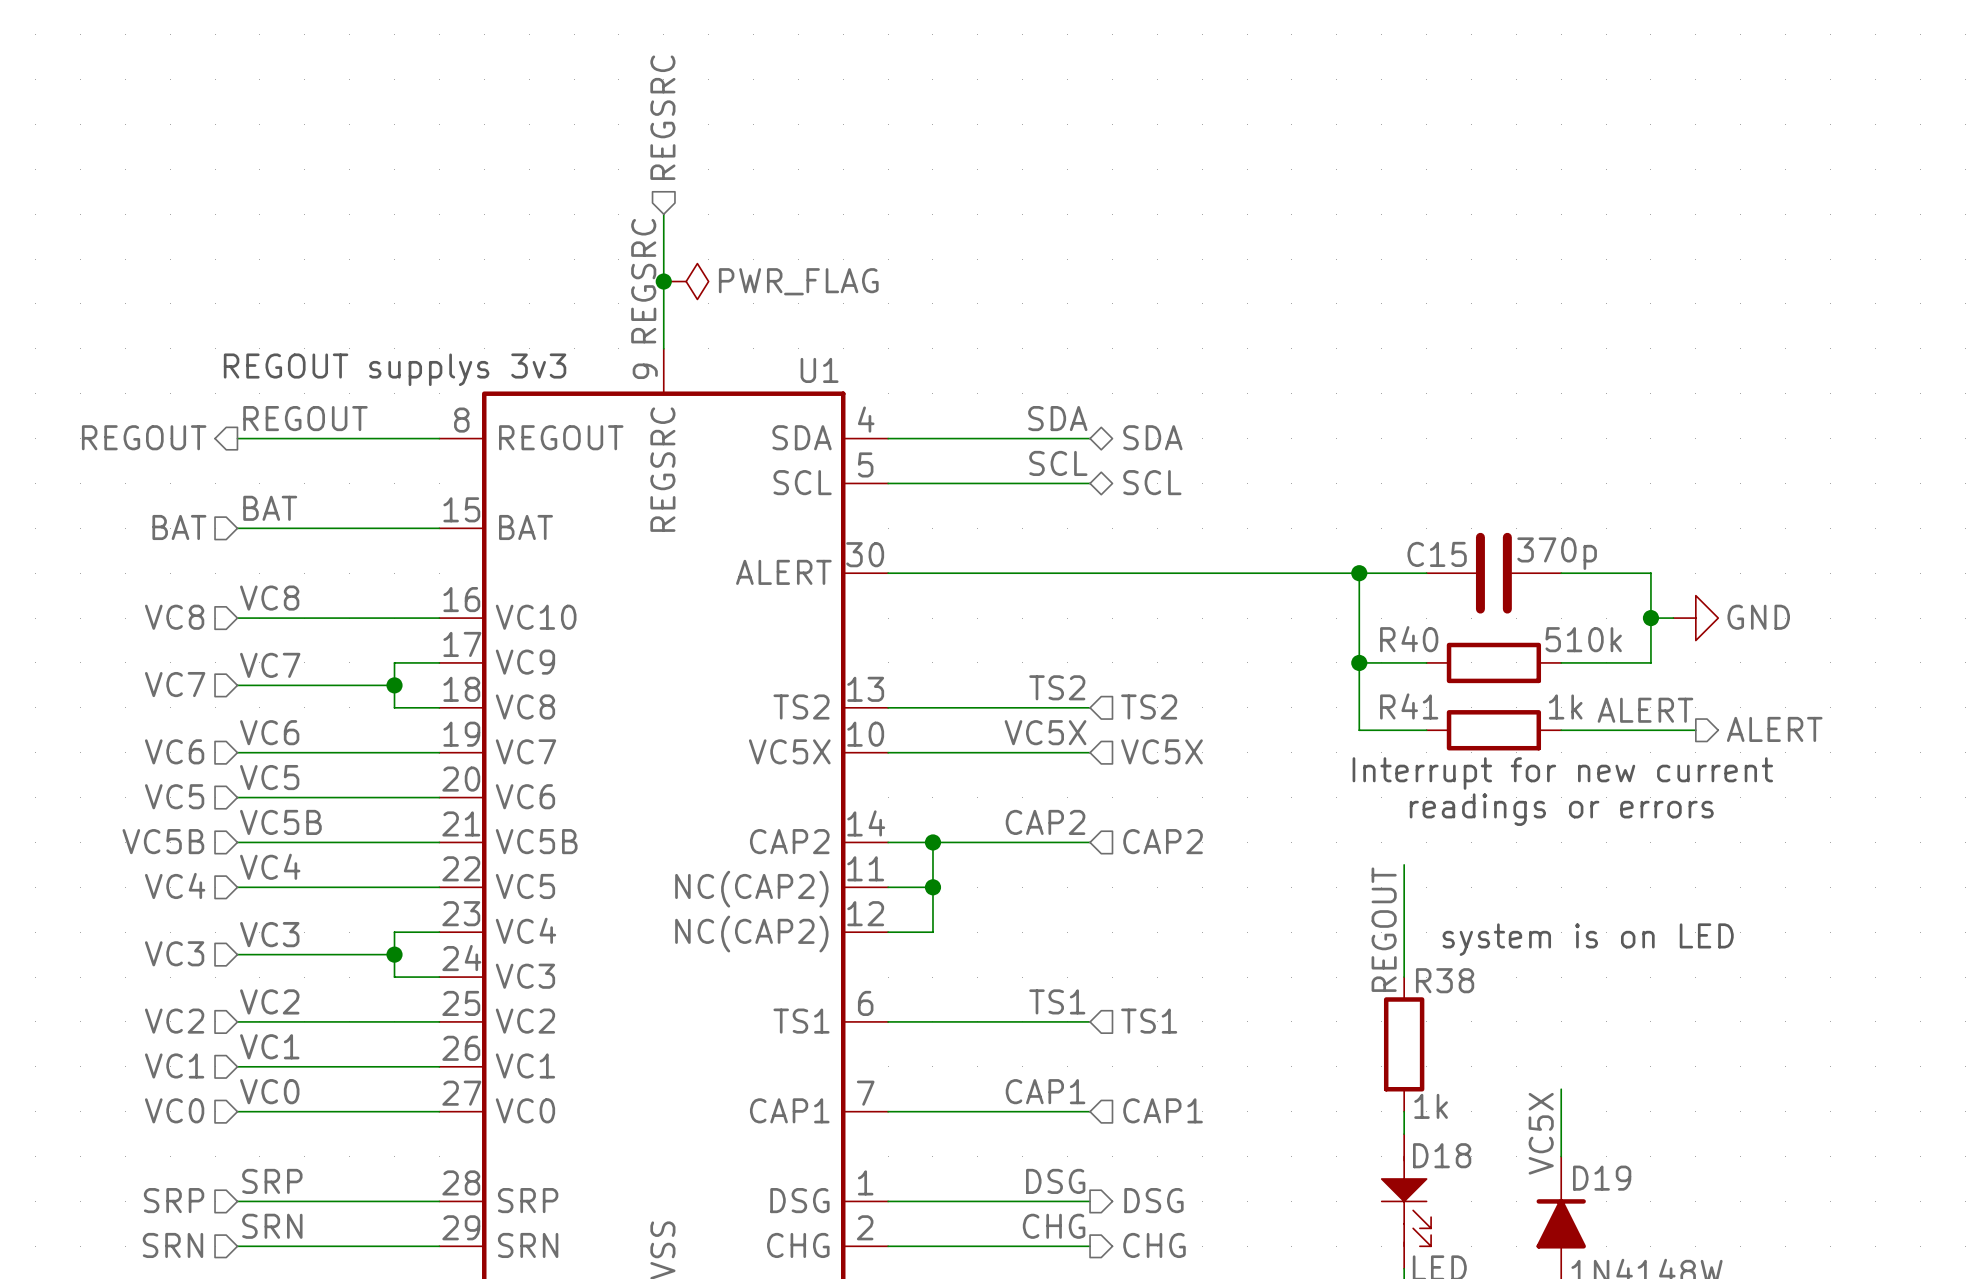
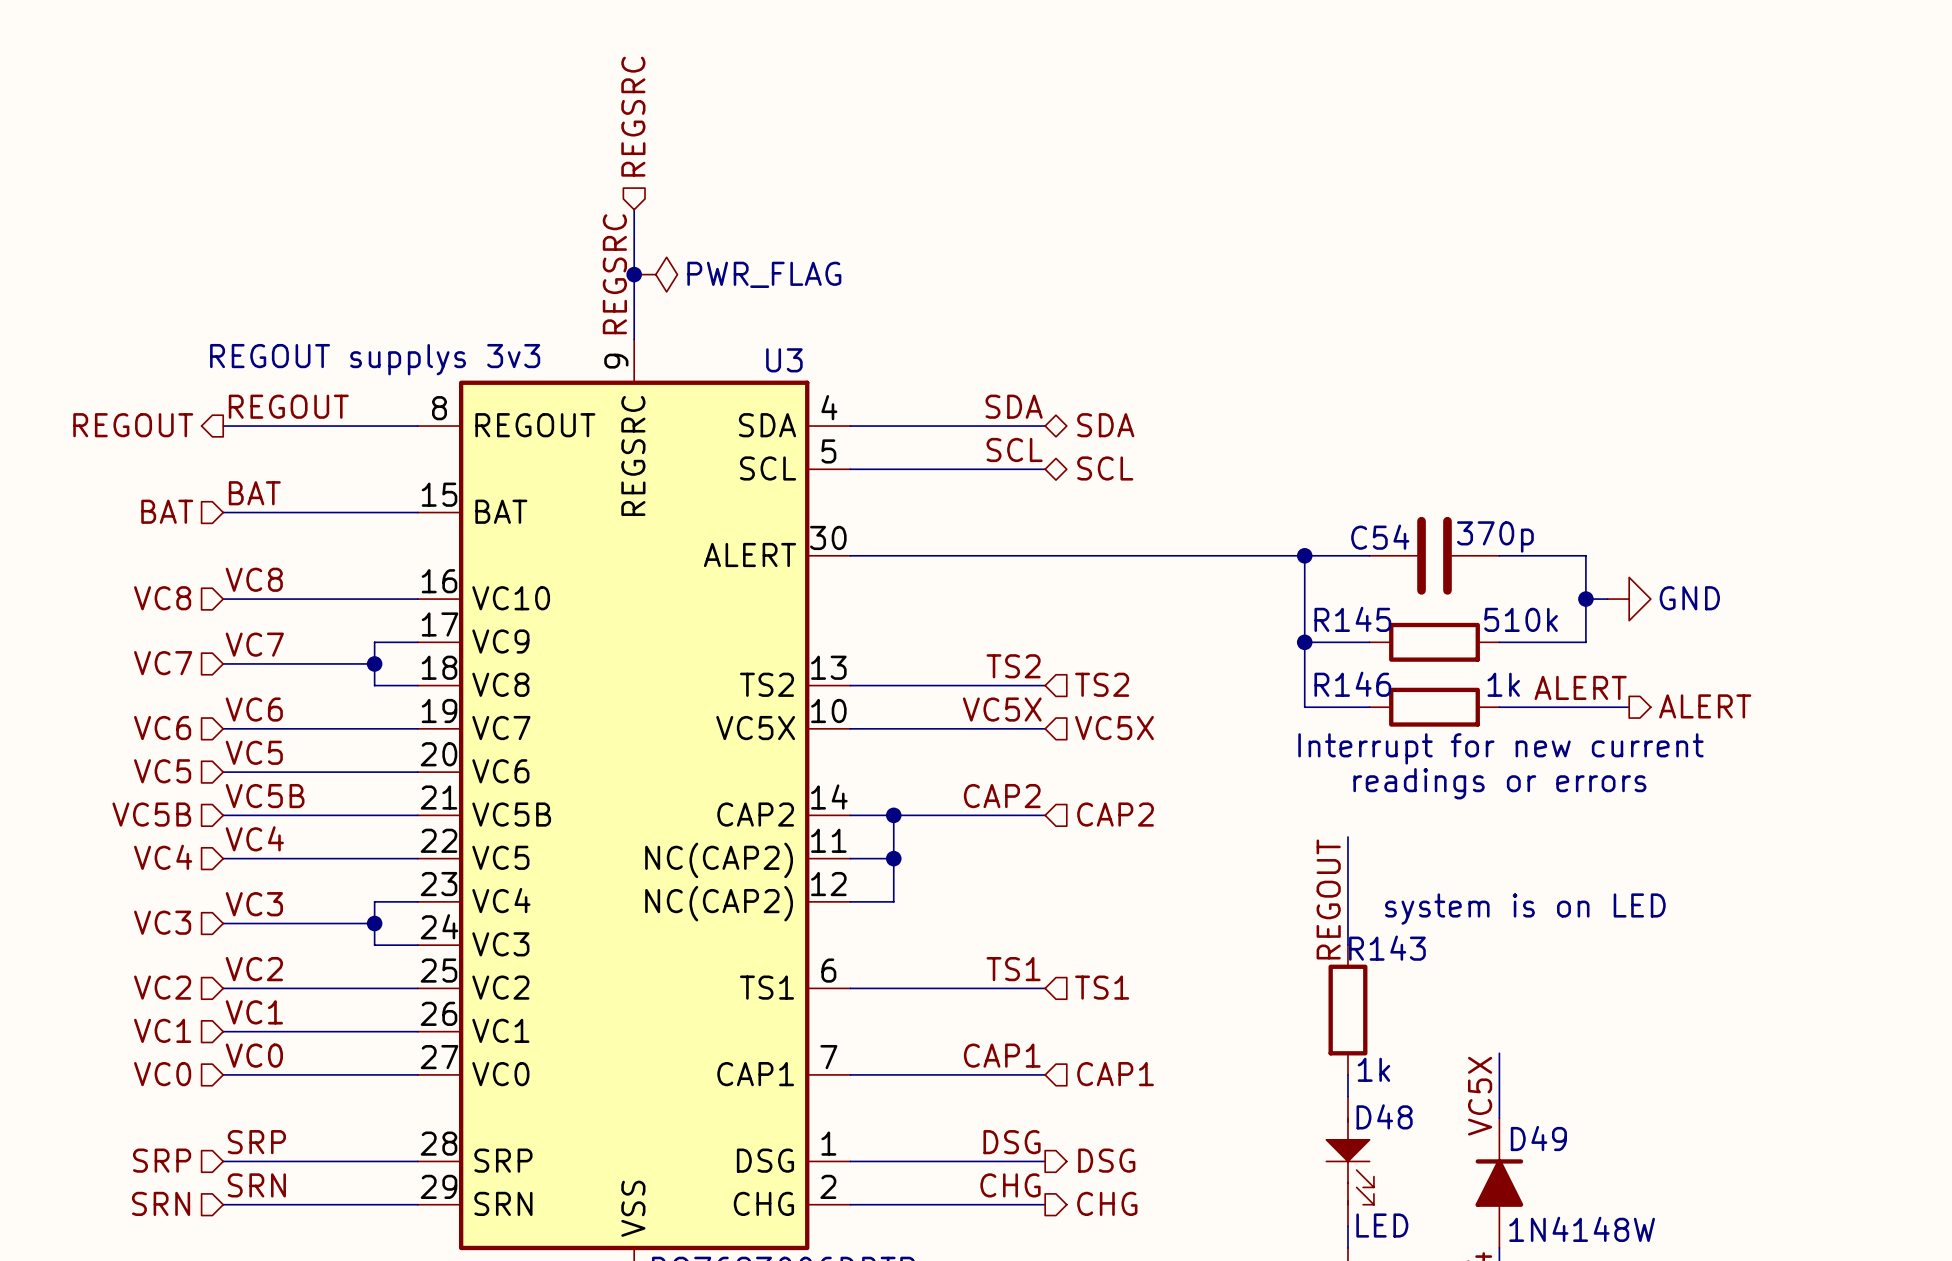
U1 name: U1 (819, 370) -> U3 (784, 360)
C15 name: C15 (1437, 554) -> C54 (1380, 537)
R40 name: R40 (1409, 639) -> R145 (1352, 619)
R41 name: R41 (1409, 706) -> R146 (1352, 684)
R38 name: R38 (1445, 980) -> R143 (1387, 948)
D18 name: D18 (1442, 1155) -> D48 (1384, 1116)
D19 name: D19 (1602, 1178) -> D49 (1538, 1138)

